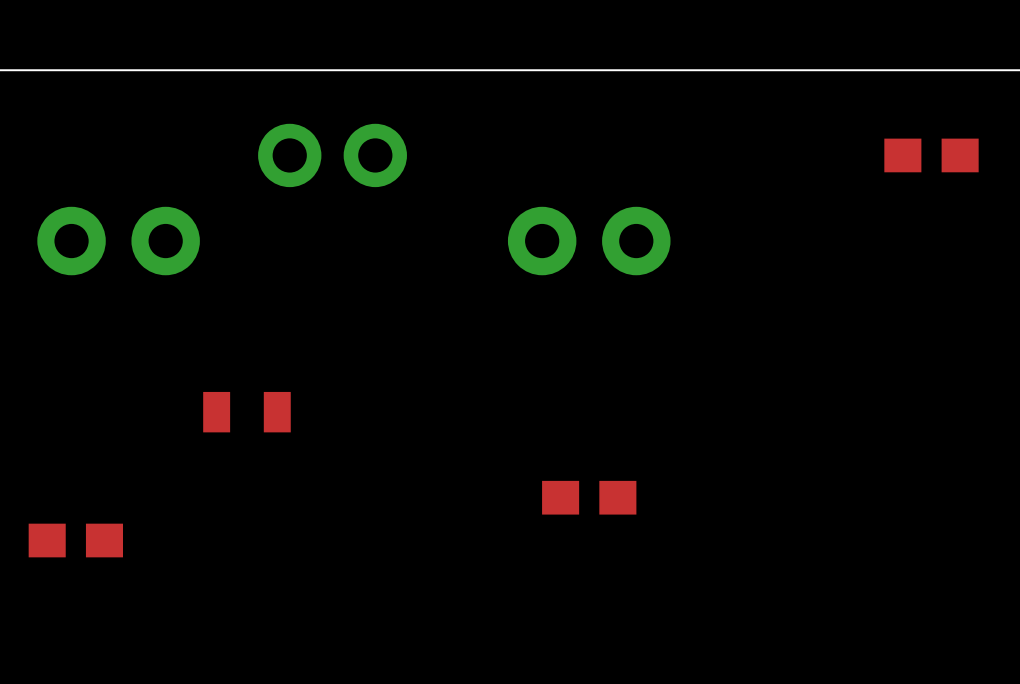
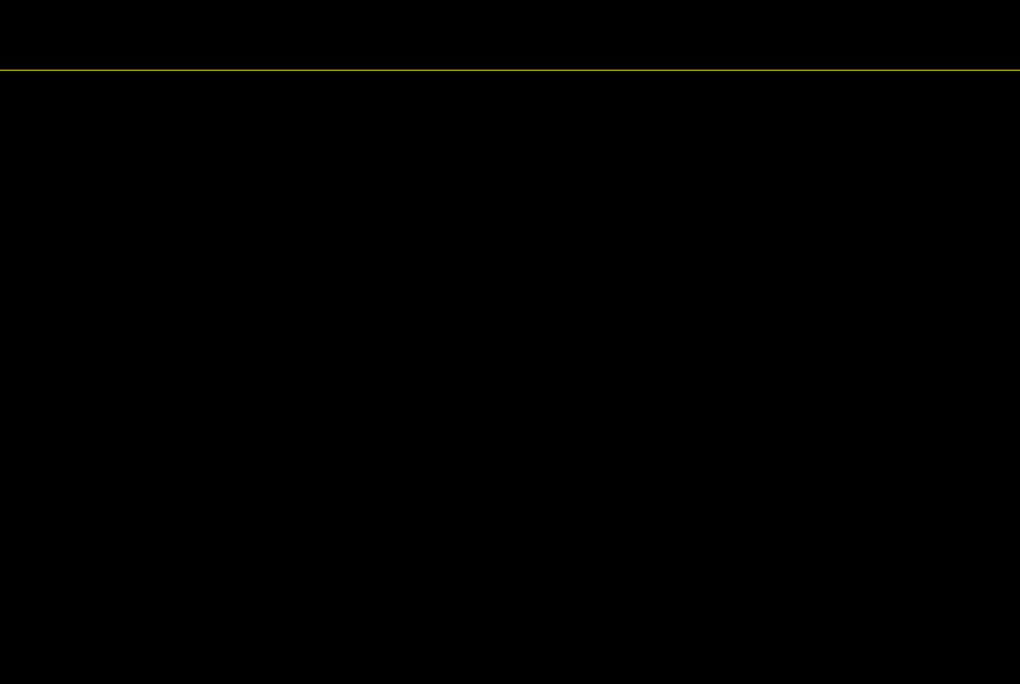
part: (332, 155) -> none
part: (931, 155) -> none
part: (118, 241) -> none
part: (589, 241) -> none
part: (246, 412) -> none
part: (589, 497) -> none
part: (75, 540) -> none

